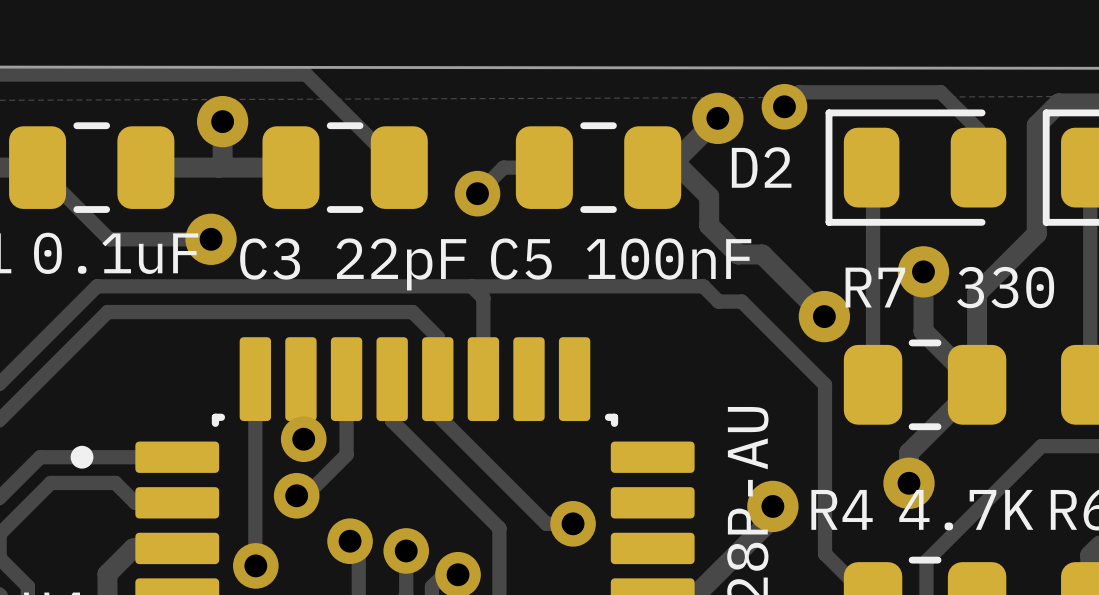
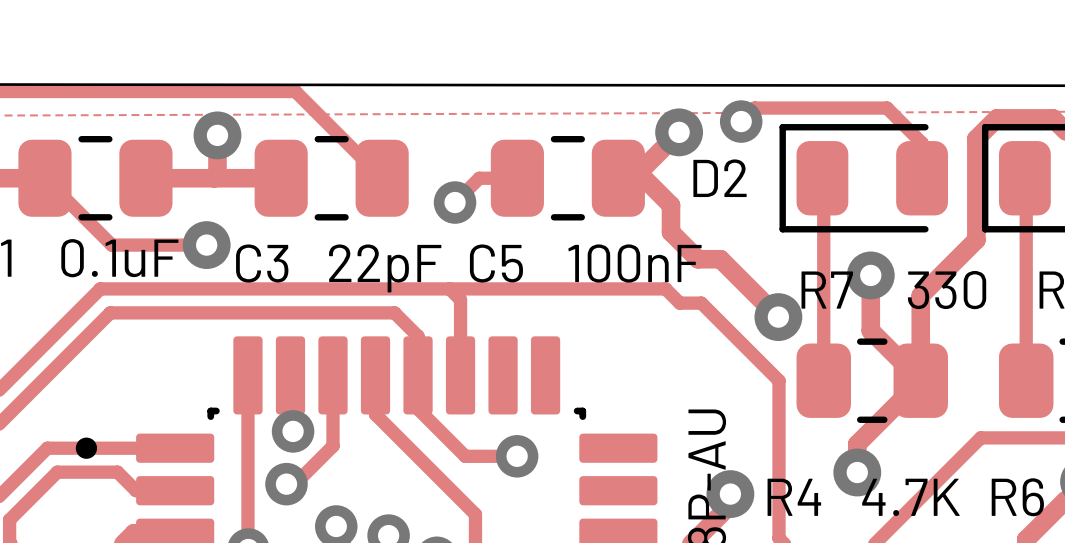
track: (488, 465) (546, 523) (573, 523) -> (465, 456) (517, 456)
via: none -> (517, 456)
via: (573, 523) -> none

